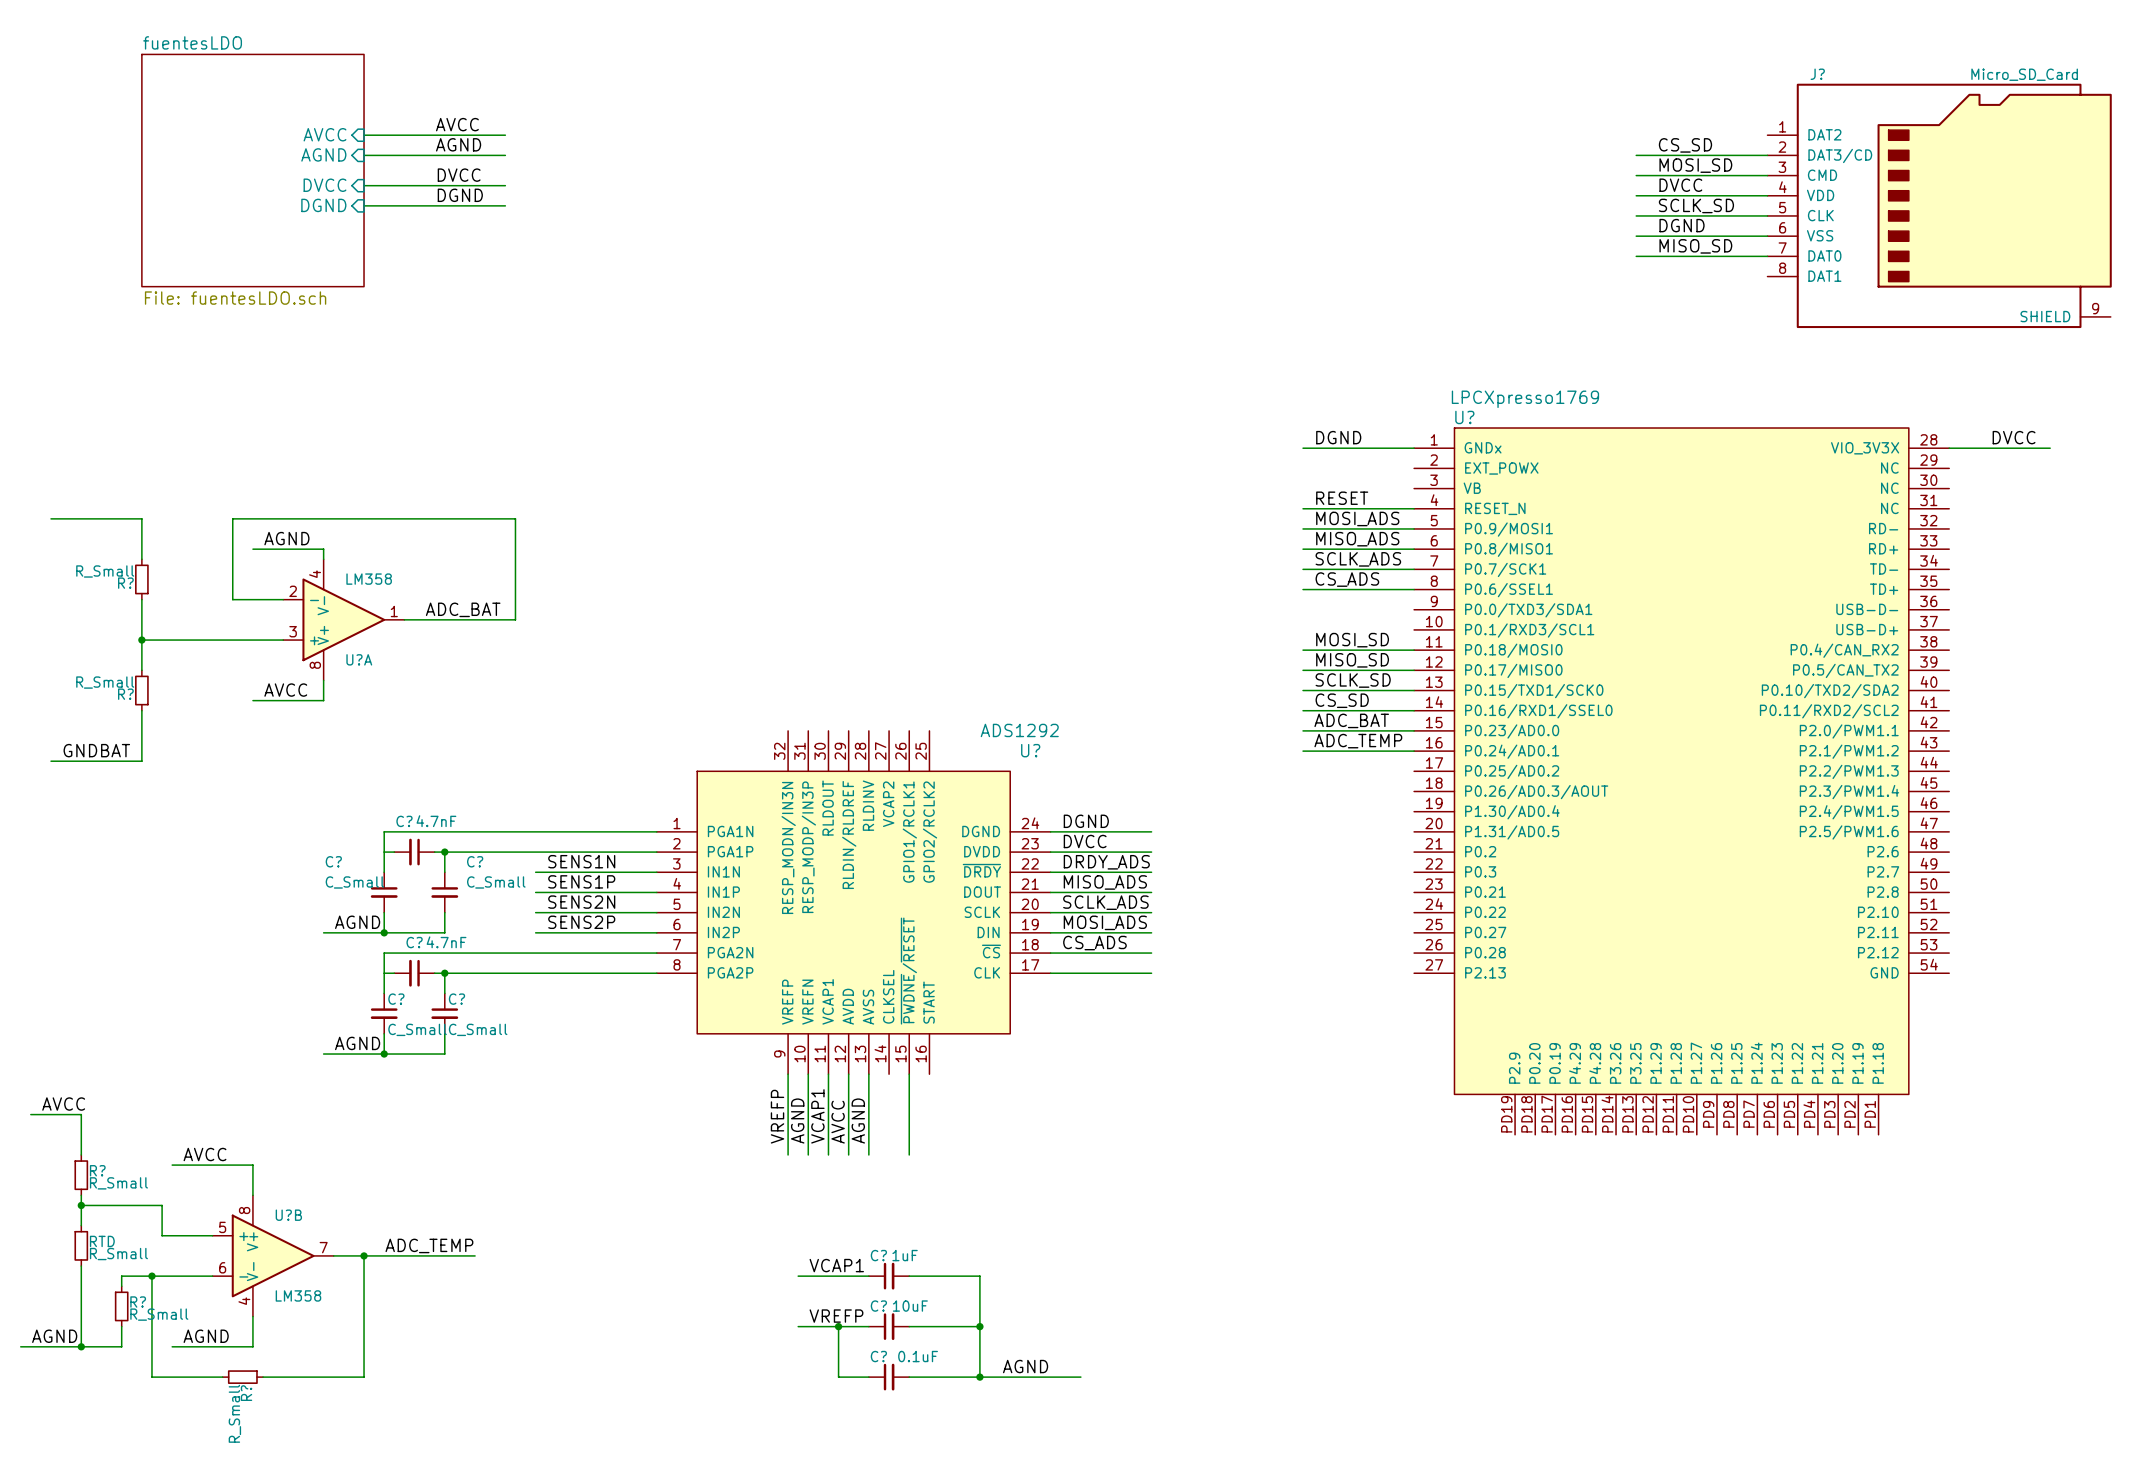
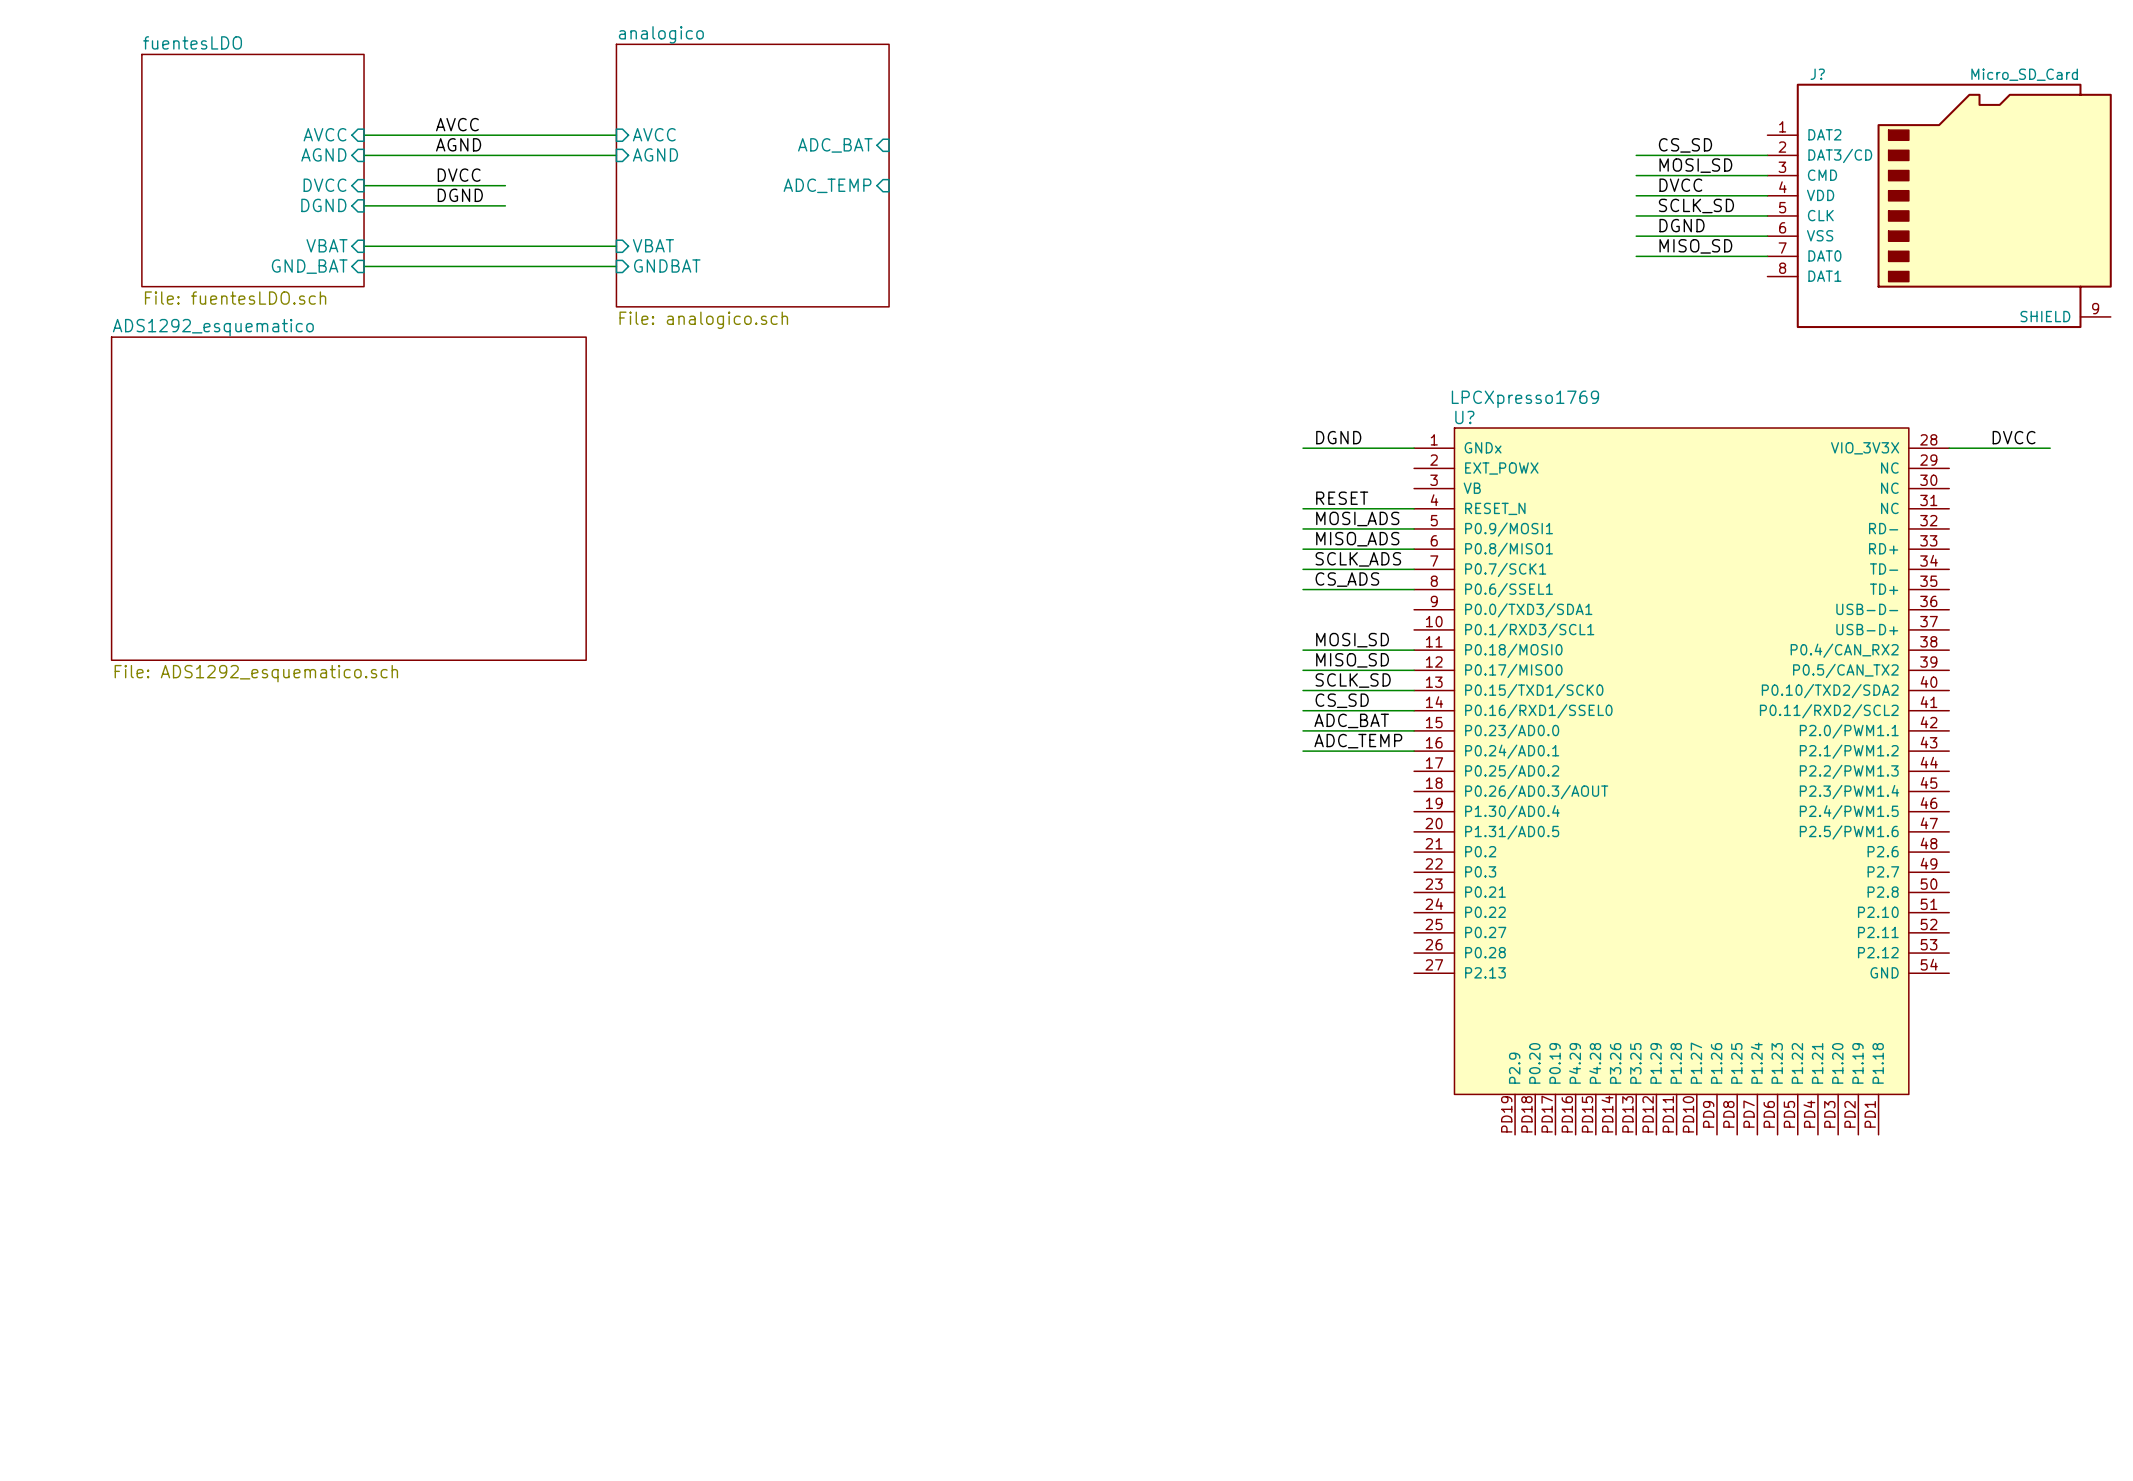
sheet pin: none -> AVCC (654, 134)
wire: none -> (505, 135) (616, 135)
sheet pin: none -> ADC_BAT (835, 145)
sheet pin: none -> AGND (655, 154)
wire: none -> (505, 155) (616, 155)
sheet analogico: none -> File: analogico.sch (752, 175)
sheet pin: none -> ADC_TEMP (827, 185)
sheet pin: none -> VBAT (327, 245)
sheet pin: none -> VBAT (653, 245)
wire: none -> (364, 246) (616, 246)
sheet pin: none -> GND_BAT (309, 266)
wire: none -> (364, 266) (616, 266)
sheet pin: none -> GNDBAT (667, 266)
sheet ADS1292_esquematico: none -> File: ADS1292_esquematico.sch (348, 498)
wire: (51, 518) (141, 518) (141, 559) -> none
label: AGND (286, 538) -> none
wire: (252, 549) (323, 549) (323, 559) -> none
R?: R_Small (141, 579) -> none
wire: (141, 599) (141, 670) -> none
wire: (283, 599) (232, 599) (232, 518) (515, 518) (515, 619) (404, 619) -> none
label: ADC_BAT (463, 609) -> none
U?A: LM358 (343, 619) -> none
wire: (141, 640) (283, 640) -> none
junction: (141, 640) -> none
wire: (323, 680) (323, 700) (252, 700) -> none
R?: R_Small (141, 690) -> none
label: AVCC (285, 690) -> none
wire: (141, 710) (141, 761) (51, 761) -> none
label: GNDBAT (96, 750) -> none
label: DGND (1086, 821) -> none
wire: (656, 831) (384, 831) (384, 872) -> none
wire: (1050, 831) (1151, 831) -> none
label: DVCC (1085, 841) -> none
wire: (384, 852) (394, 852) -> none
C?: 4.7nF (414, 852) -> none
wire: (434, 852) (656, 852) -> none
wire: (444, 852) (444, 872) -> none
junction: (444, 852) -> none
wire: (1050, 852) (1151, 852) -> none
label: SENS1N (581, 861) -> none
label: DRDY_ADS (1106, 862) -> none
wire: (535, 872) (656, 872) -> none
wire: (1050, 872) (1151, 872) -> none
label: SENS1P (581, 881) -> none
label: MISO_ADS (1105, 882) -> none
C?: C_Small (384, 892) -> none
C?: C_Small (444, 892) -> none
wire: (535, 892) (656, 892) -> none
wire: (1050, 892) (1151, 892) -> none
label: SENS2N (581, 902) -> none
U?: ADS1292 (853, 902) -> none
label: SCLK_ADS (1105, 902) -> none
wire: (384, 912) (384, 932) -> none
wire: (444, 912) (444, 932) (323, 932) -> none
wire: (535, 912) (656, 912) -> none
wire: (1050, 912) (1151, 912) -> none
label: AGND (357, 922) -> none
label: SENS2P (581, 922) -> none
label: MOSI_ADS (1105, 922) -> none
junction: (384, 932) -> none
wire: (535, 932) (656, 932) -> none
wire: (1050, 932) (1151, 932) -> none
label: CS_ADS (1094, 943) -> none
wire: (656, 953) (384, 953) (384, 993) -> none
wire: (1050, 953) (1151, 953) -> none
wire: (384, 973) (394, 973) -> none
C?: 4.7nF (414, 973) -> none
wire: (434, 973) (656, 973) -> none
wire: (444, 973) (444, 993) -> none
junction: (444, 973) -> none
wire: (1050, 973) (1151, 973) -> none
C?: C_Small (384, 1013) -> none
C?: C_Small (444, 1013) -> none
wire: (384, 1033) (384, 1054) -> none
wire: (444, 1033) (444, 1054) (323, 1054) -> none
label: AGND (357, 1043) -> none
junction: (384, 1054) -> none
wire: (788, 1074) (788, 1154) -> none
wire: (808, 1074) (808, 1154) -> none
wire: (828, 1074) (828, 1154) -> none
wire: (848, 1074) (848, 1154) -> none
wire: (868, 1074) (868, 1154) -> none
wire: (909, 1074) (909, 1154) -> none
label: AVCC (63, 1104) -> none
wire: (30, 1114) (81, 1114) (81, 1154) -> none
label: VREFP (777, 1116) -> none
label: VCAP1 (817, 1116) -> none
label: AGND (797, 1121) -> none
label: AGND (858, 1121) -> none
label: AVCC (838, 1122) -> none
label: AVCC (204, 1154) -> none
wire: (172, 1165) (252, 1165) (252, 1195) -> none
R?: R_Small (81, 1175) -> none
wire: (81, 1195) (81, 1225) -> none
wire: (81, 1205) (162, 1205) (162, 1235) (212, 1235) -> none
junction: (81, 1205) -> none
RTD: R_Small (81, 1245) -> none
label: ADC_TEMP (429, 1245) -> none
U?B: LM358 (273, 1255) -> none
wire: (333, 1255) (475, 1255) -> none
wire: (364, 1255) (364, 1377) (263, 1377) -> none
junction: (364, 1255) -> none
label: VCAP1 (836, 1265) -> none
wire: (81, 1266) (81, 1346) -> none
wire: (151, 1276) (151, 1377) (222, 1377) -> none
junction: (151, 1276) -> none
wire: (212, 1276) (121, 1276) (121, 1286) -> none
wire: (798, 1276) (868, 1276) -> none
C?: 1uF (889, 1276) -> none
wire: (909, 1276) (979, 1276) (979, 1377) -> none
R?: R_Small (121, 1306) -> none
wire: (252, 1316) (252, 1346) (172, 1346) -> none
label: VREFP (836, 1316) -> none
wire: (121, 1326) (121, 1346) (20, 1346) -> none
wire: (798, 1326) (868, 1326) -> none
wire: (838, 1326) (838, 1377) (868, 1377) -> none
junction: (838, 1326) -> none
C?: 10uF (889, 1326) -> none
wire: (909, 1326) (979, 1326) -> none
junction: (979, 1326) -> none
label: AGND (54, 1336) -> none
label: AGND (206, 1336) -> none
junction: (81, 1346) -> none
label: AGND (1025, 1366) -> none
R?: R_Small (242, 1377) -> none
C?: 0.1uF (889, 1377) -> none
wire: (909, 1377) (1080, 1377) -> none
junction: (979, 1377) -> none

